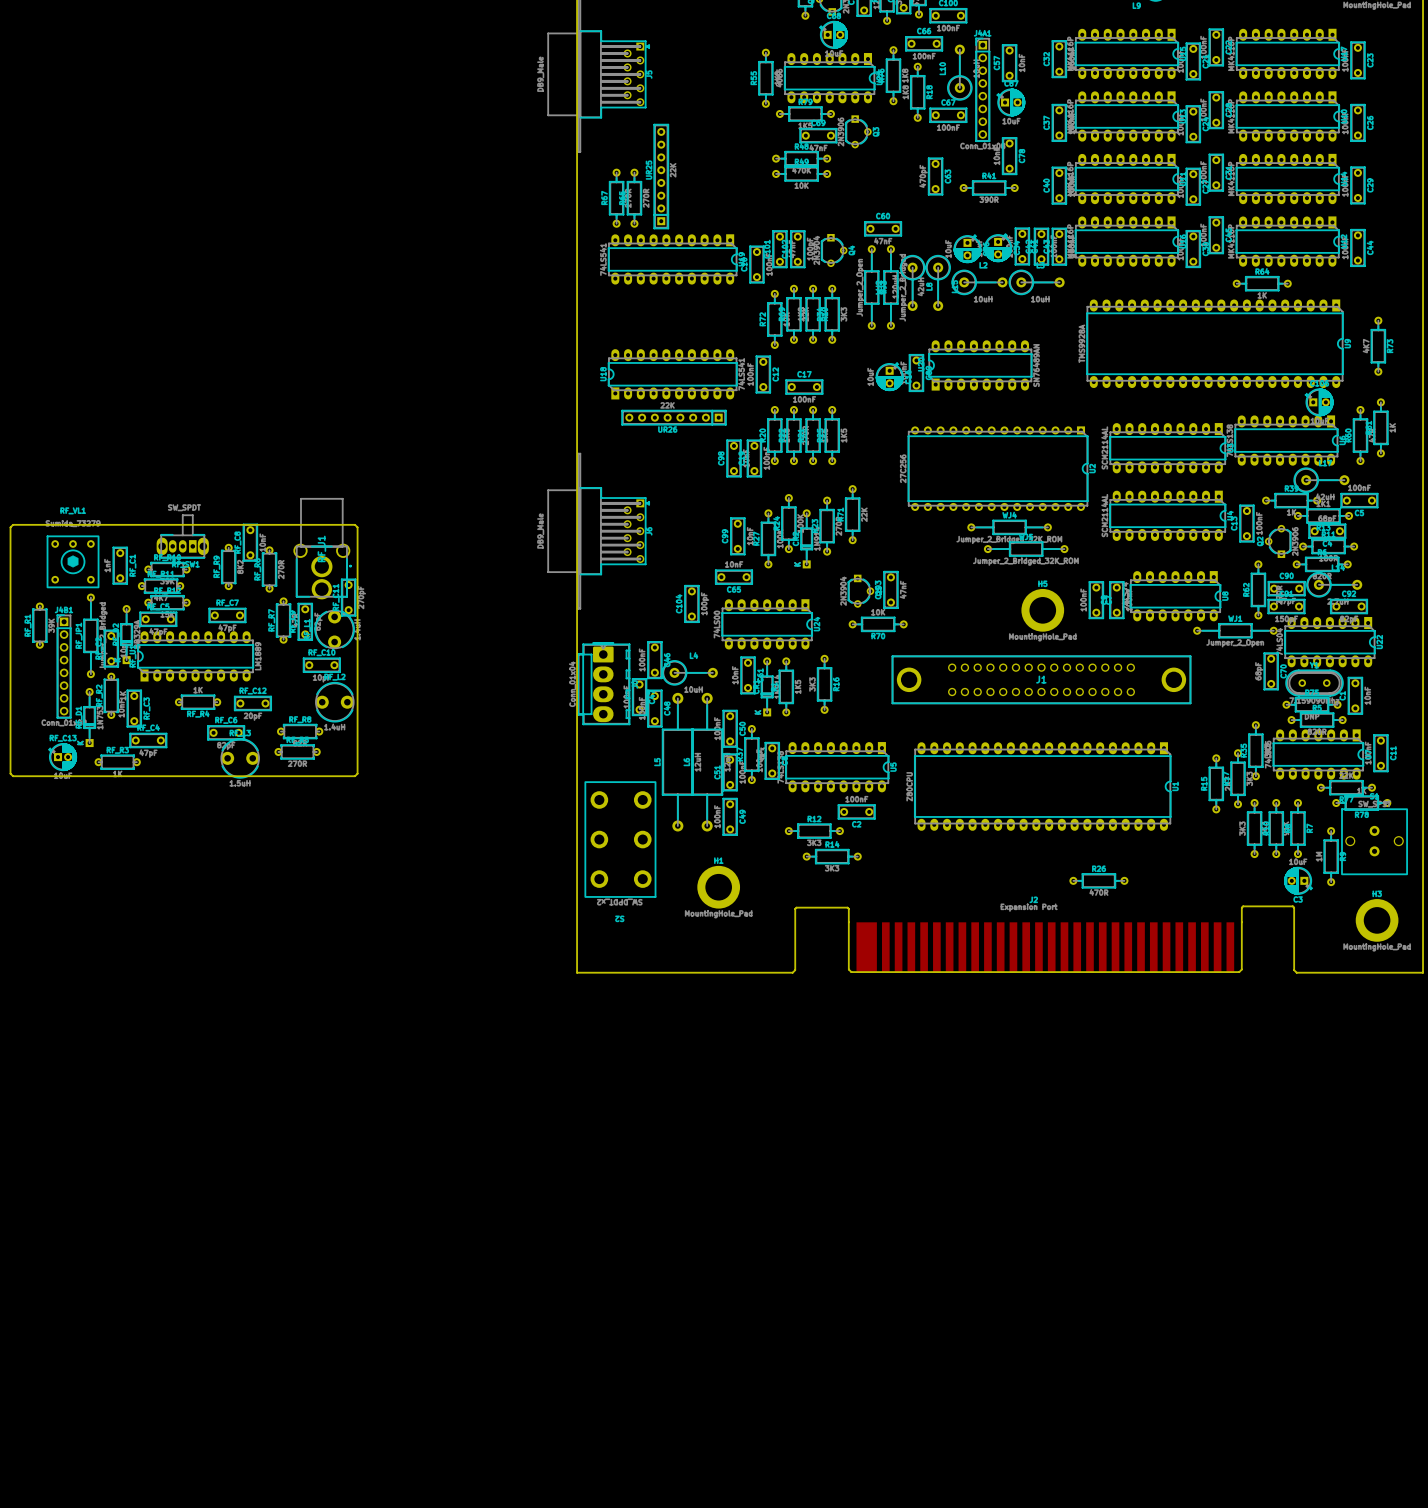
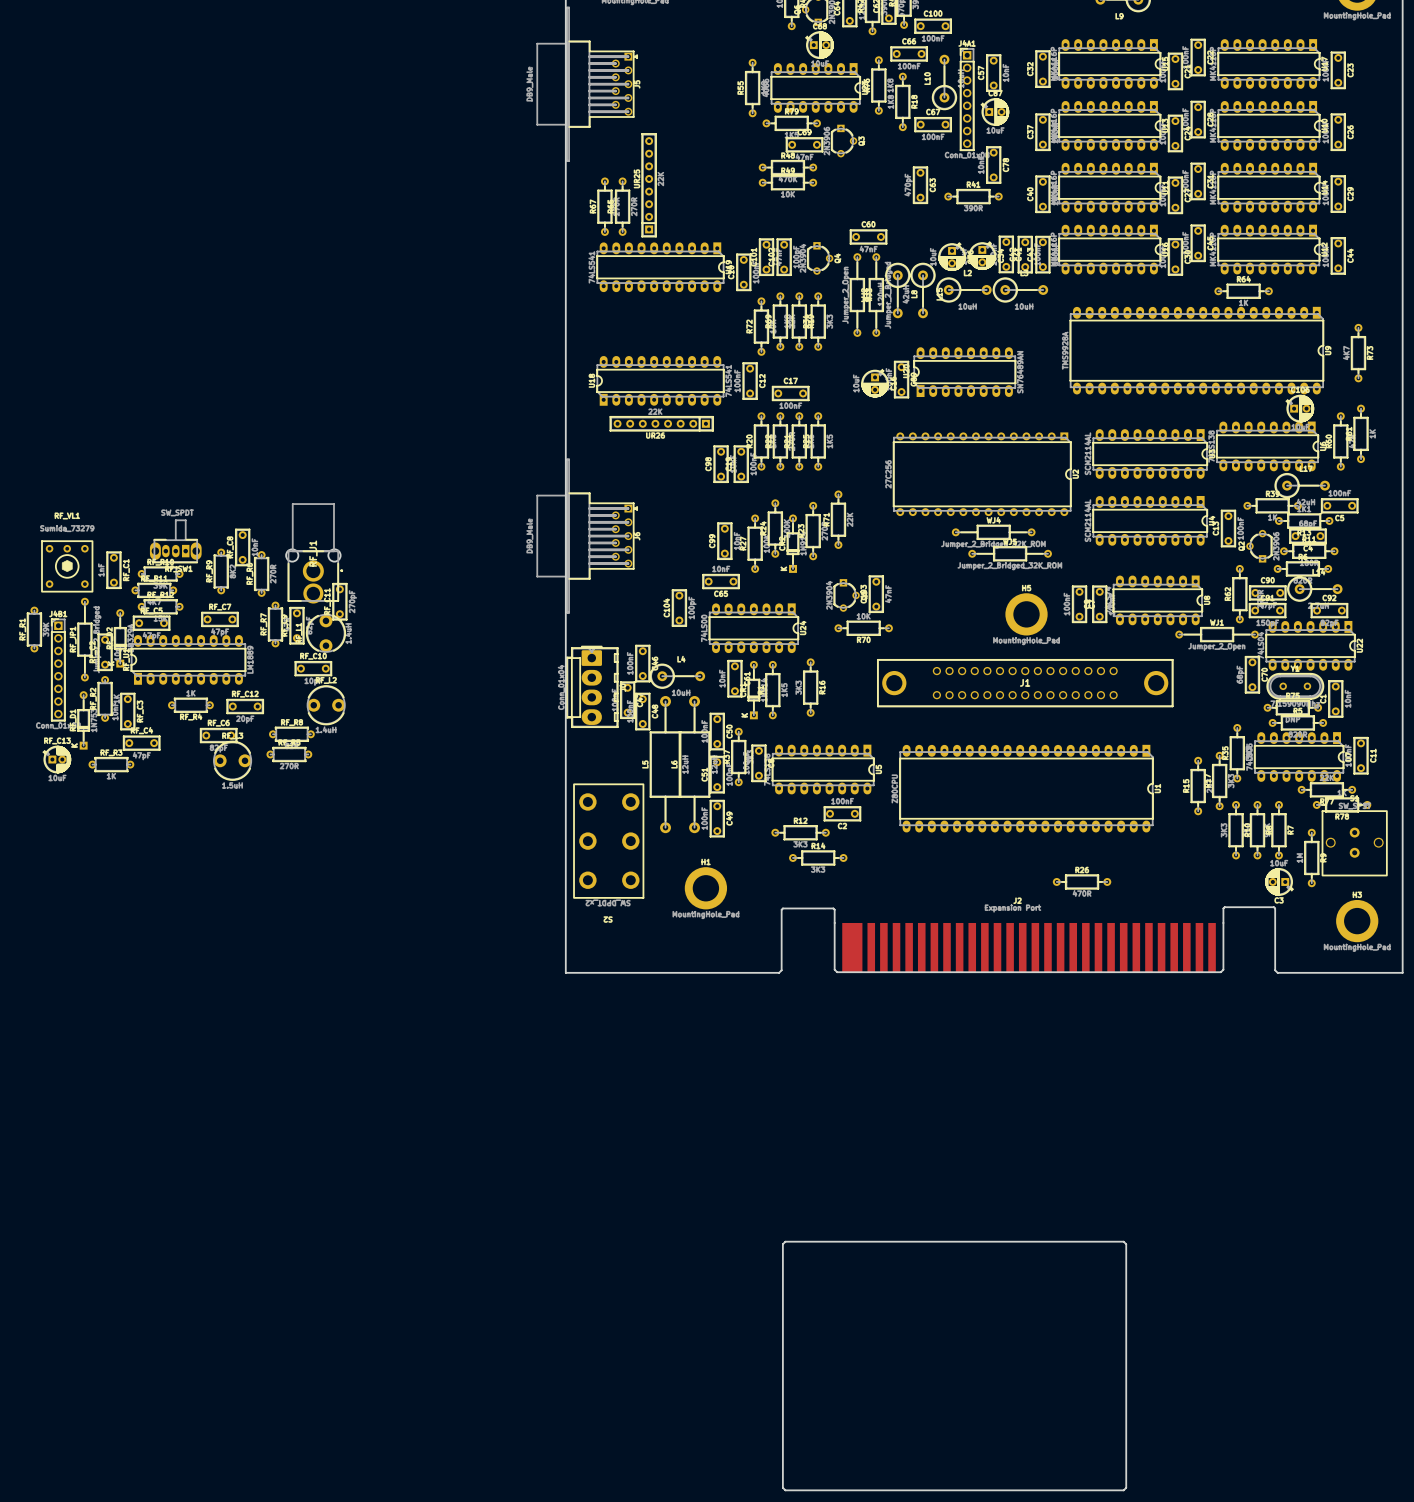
board edge: (13, 524) (10, 527) (10, 773) (13, 776) (355, 776) (357, 773) (357, 527) (355, 524) (13, 524) -> none
board edge: none -> (785, 1241) (782, 1244) (782, 1487) (785, 1490) (1123, 1490) (1126, 1487) (1126, 1244) (1123, 1241) (785, 1241)

